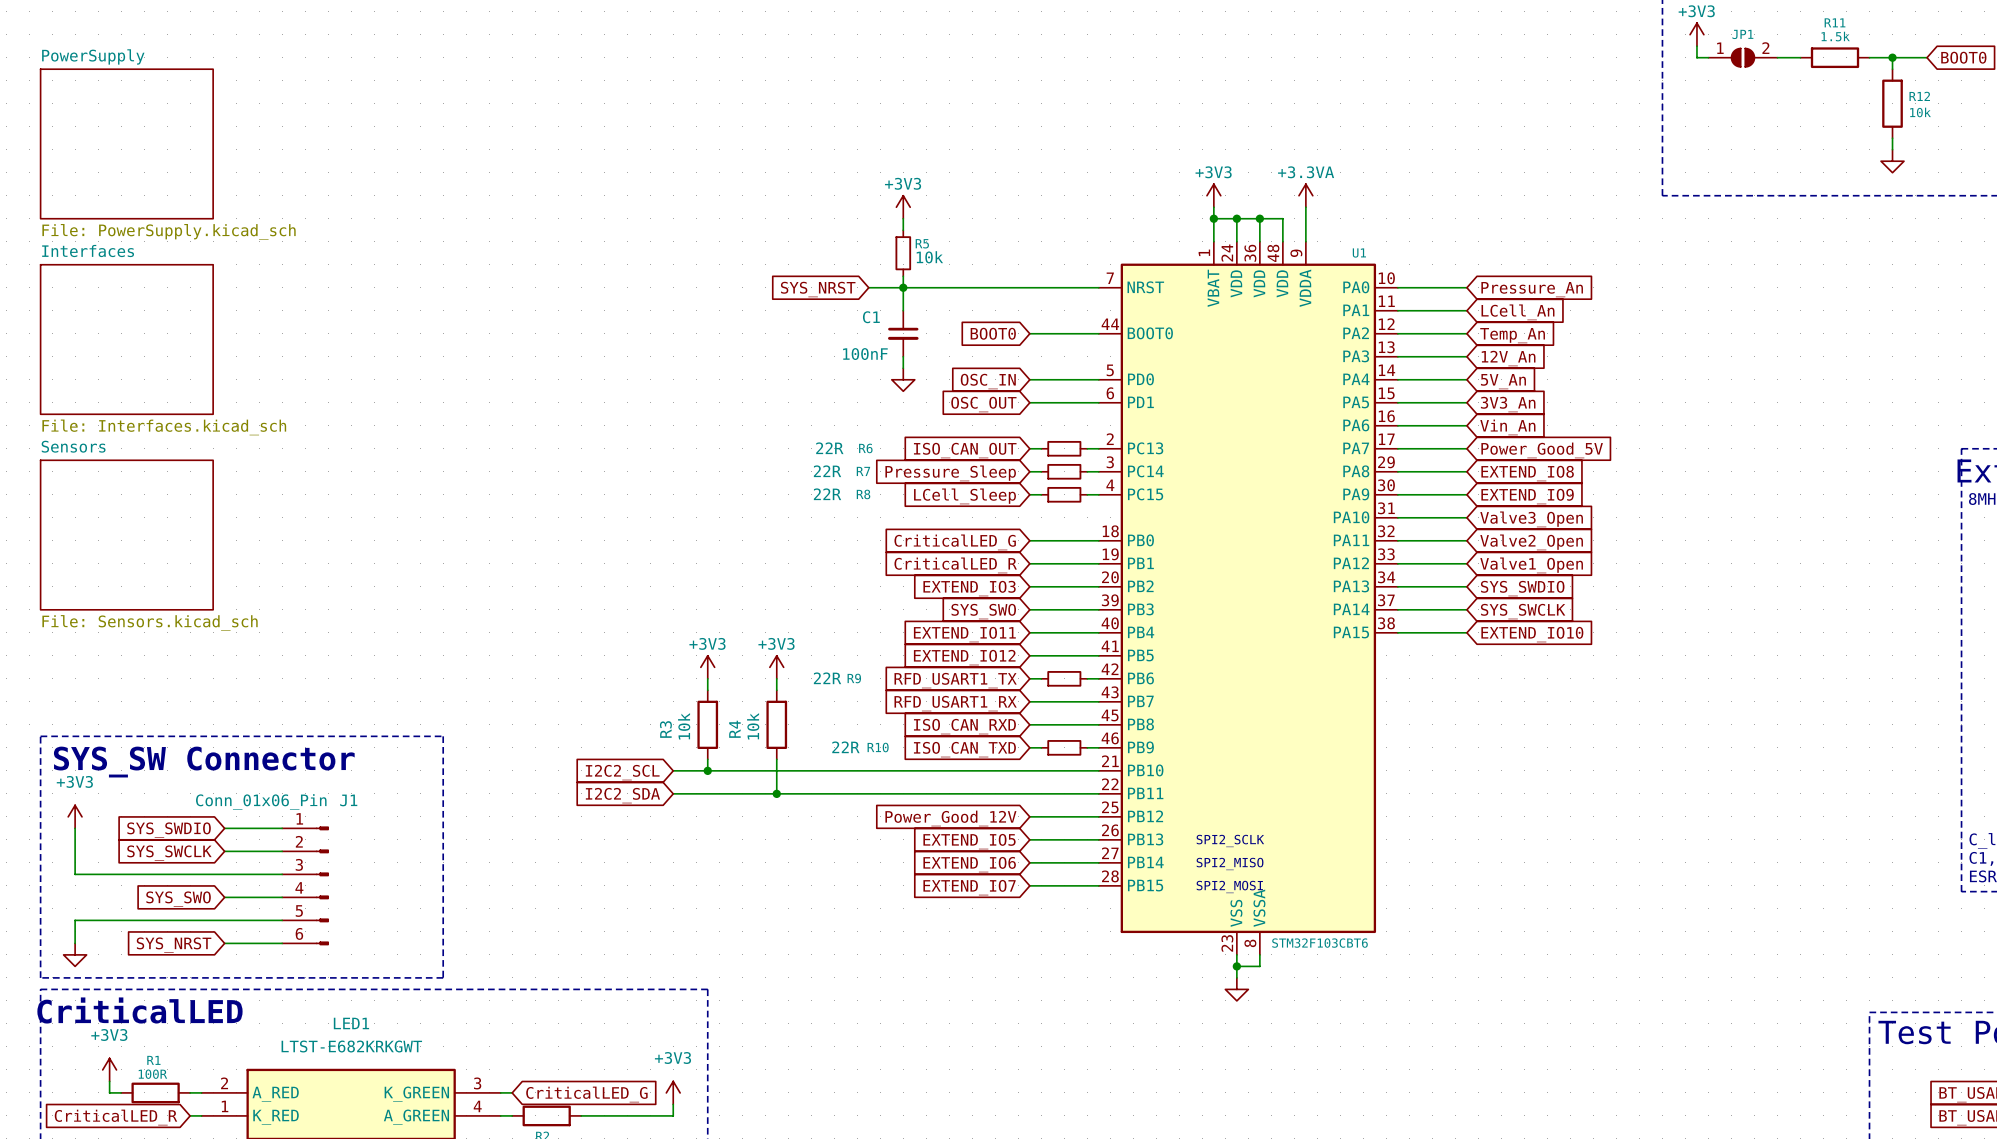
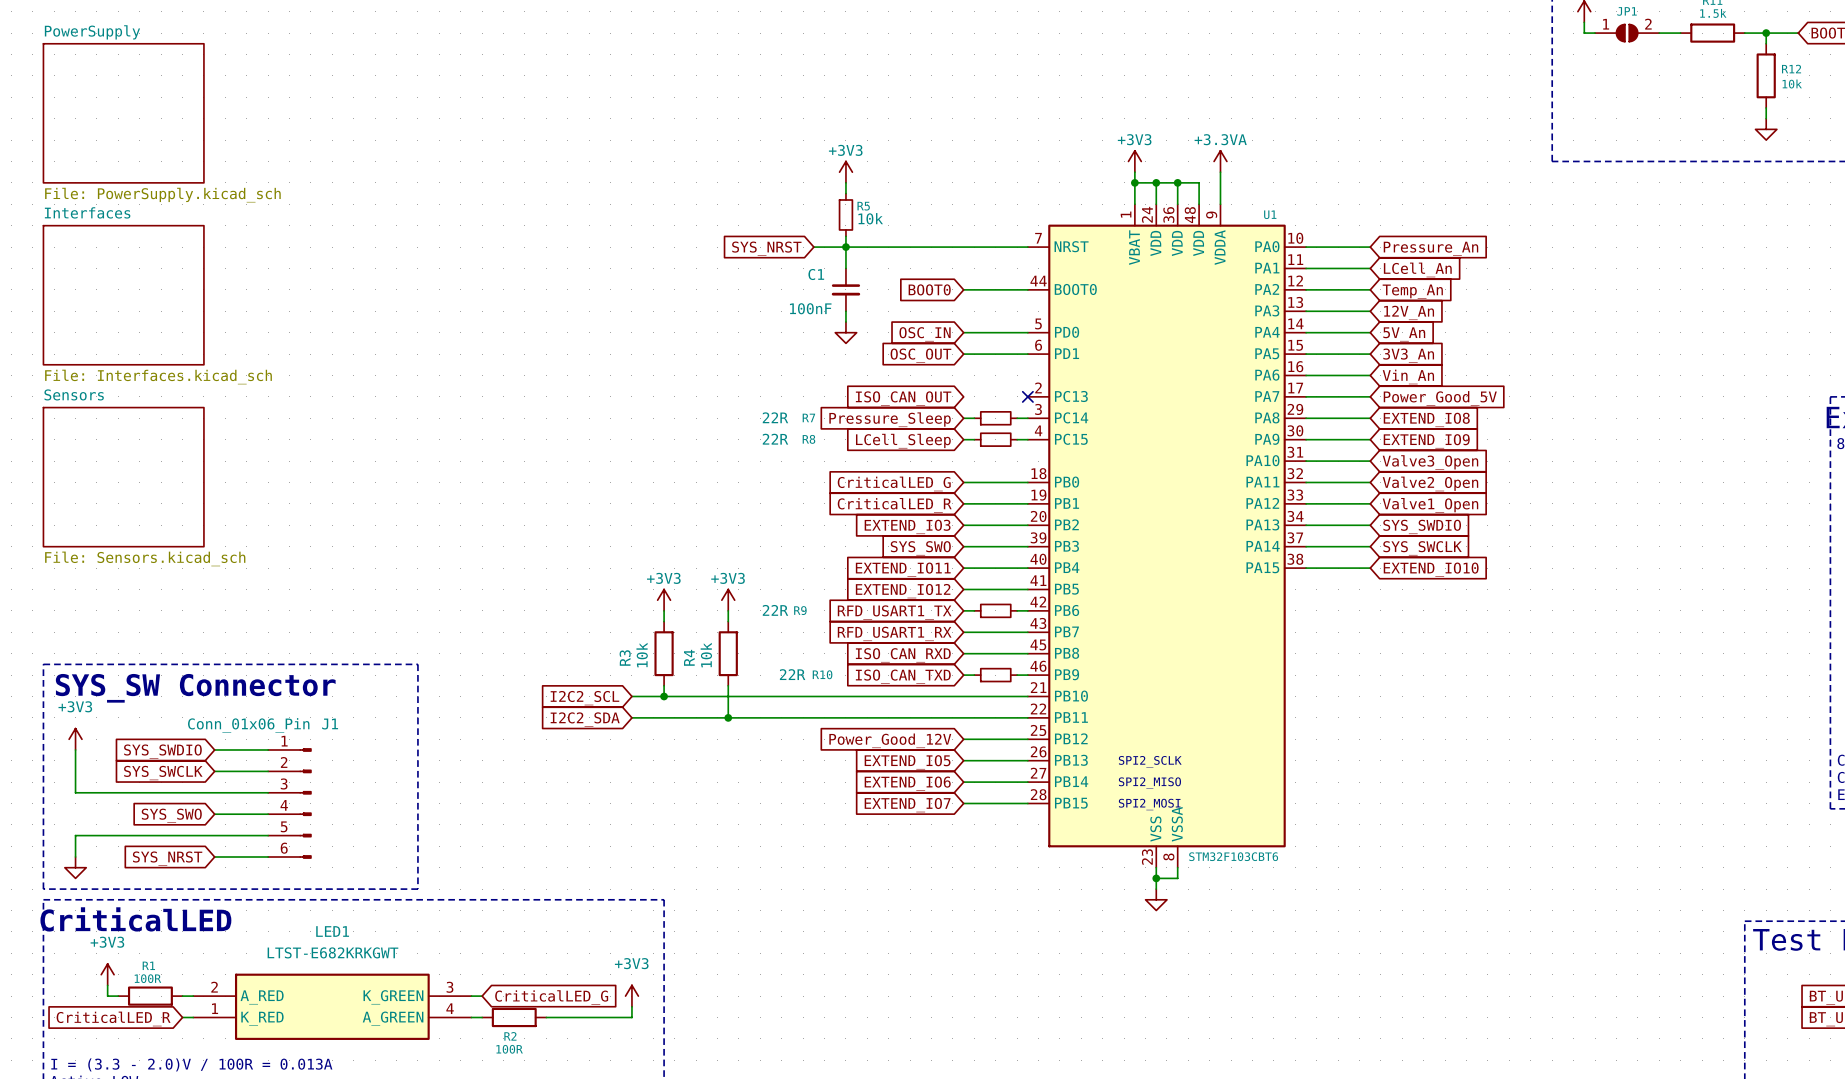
wire: (1029, 448) (1041, 448) -> none
R6: 22R (1064, 448) -> none
wire: (1087, 448) (1098, 448) -> none
no-connect mark: none -> (1027, 396)

